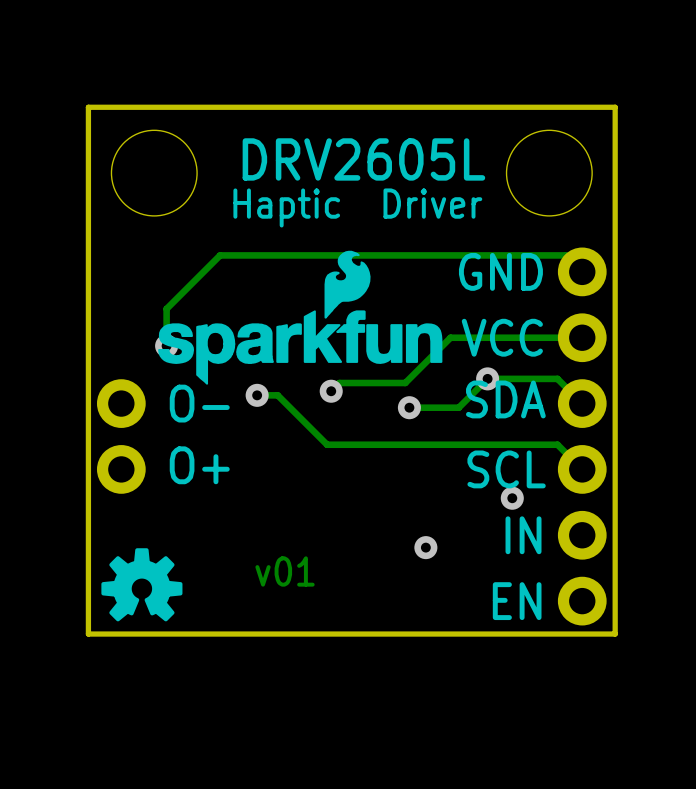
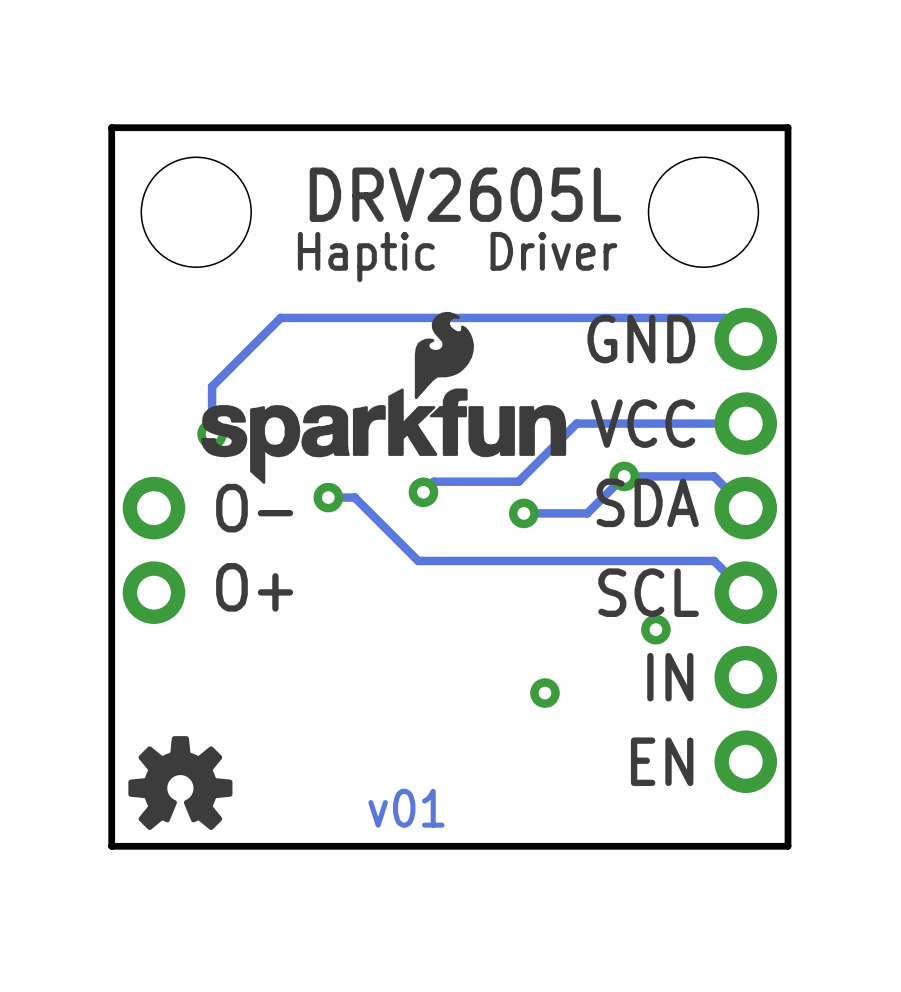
text position: v01 (285, 571) -> v01 (406, 808)
drawing position: (141, 584) -> (180, 783)
board edge: (615, 634) (88, 634) -> (788, 804) (788, 846) (111, 846) (111, 804)

